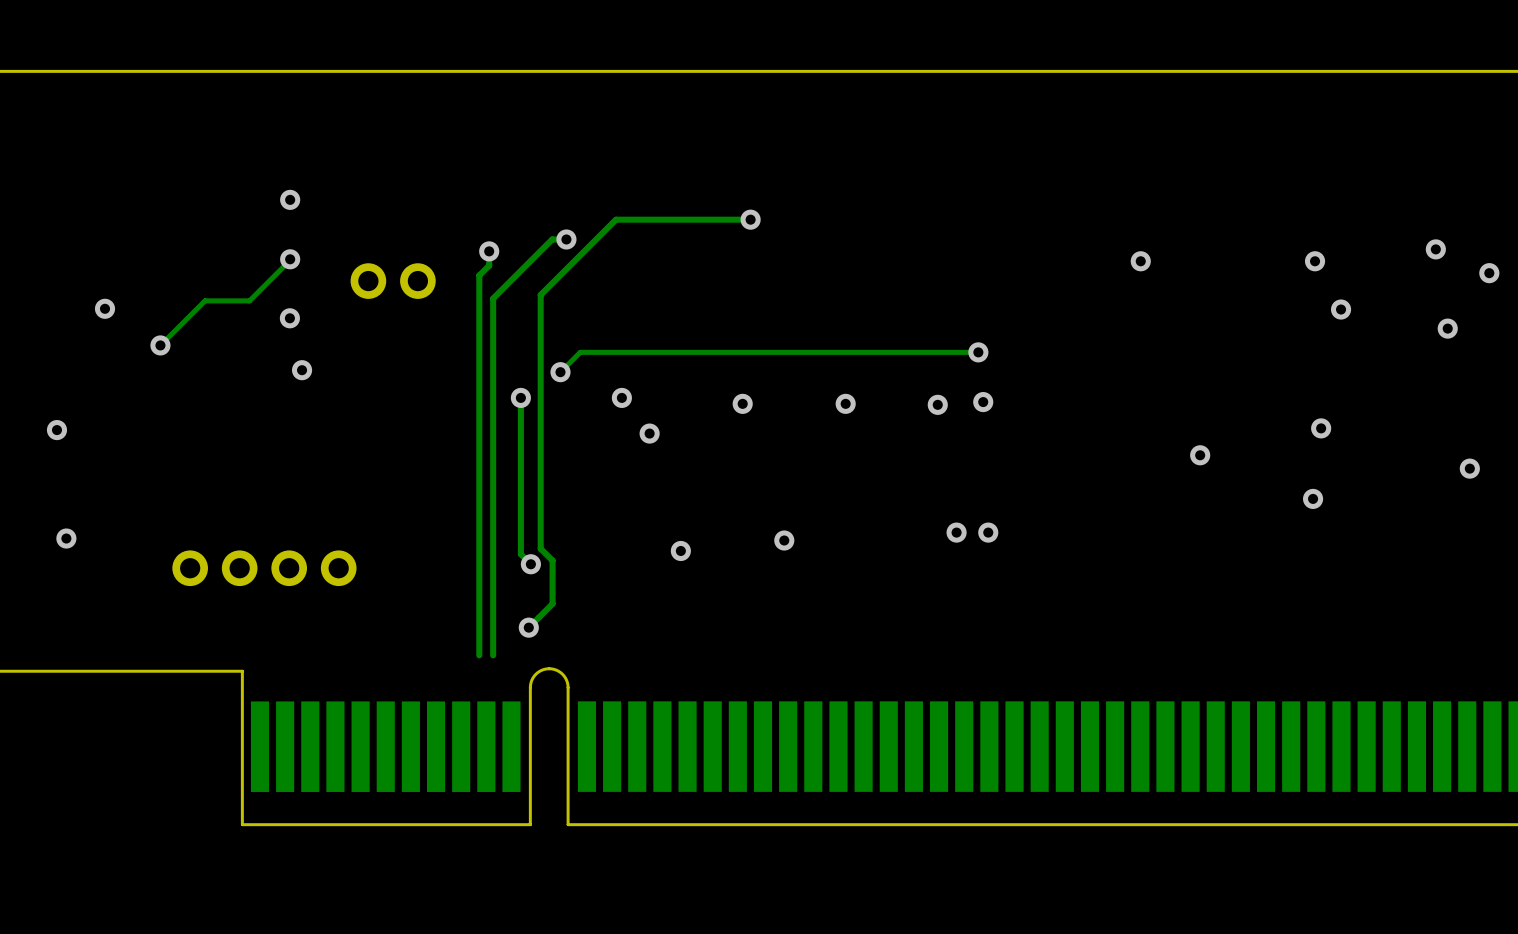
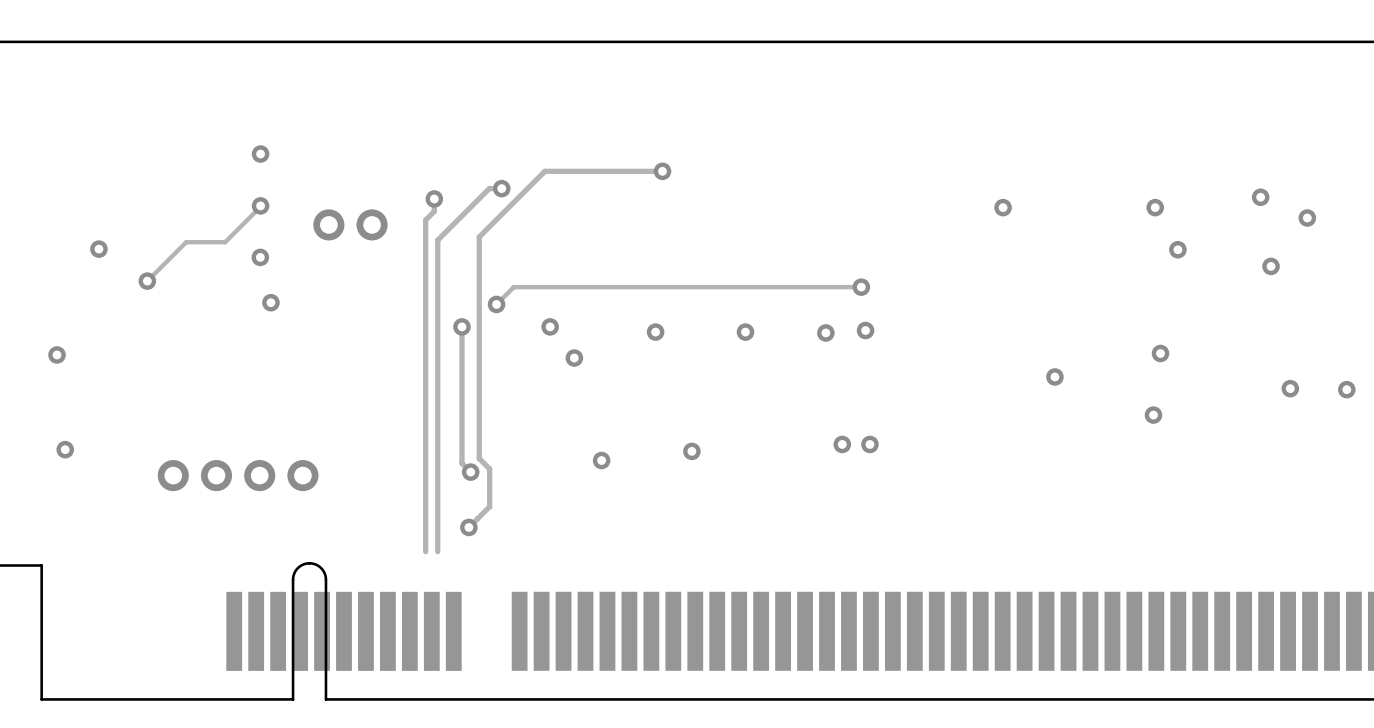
board edge: (39, 671) (242, 671) (242, 824) -> (41, 565) (41, 699) (218, 699)
board edge: (365, 824) (327, 824) -> (325, 699) (325, 577) (319, 566) (309, 563) (299, 566) (293, 577) (293, 699)
board edge: (568, 824) (567, 685) (562, 674) (549, 668) (535, 674) (530, 685) (530, 824) -> (503, 699) (470, 699)

